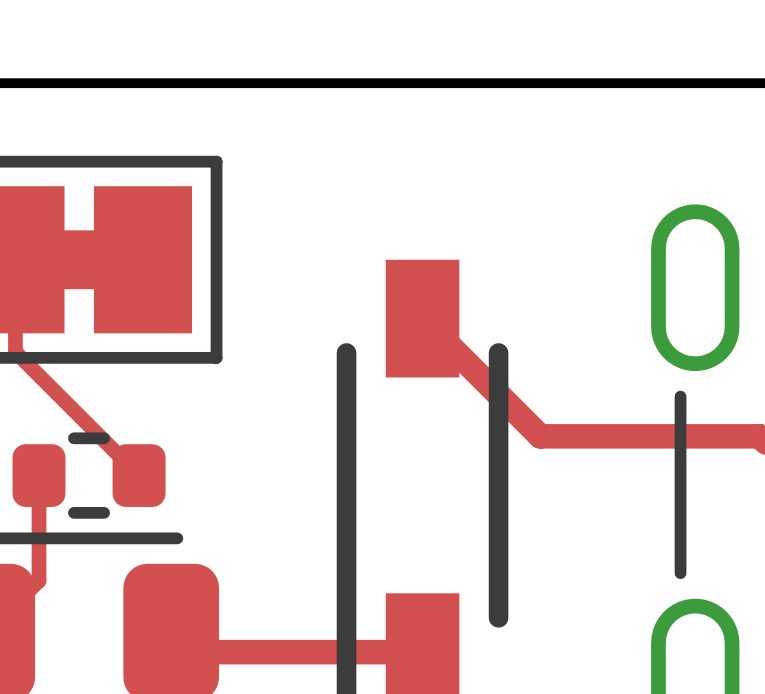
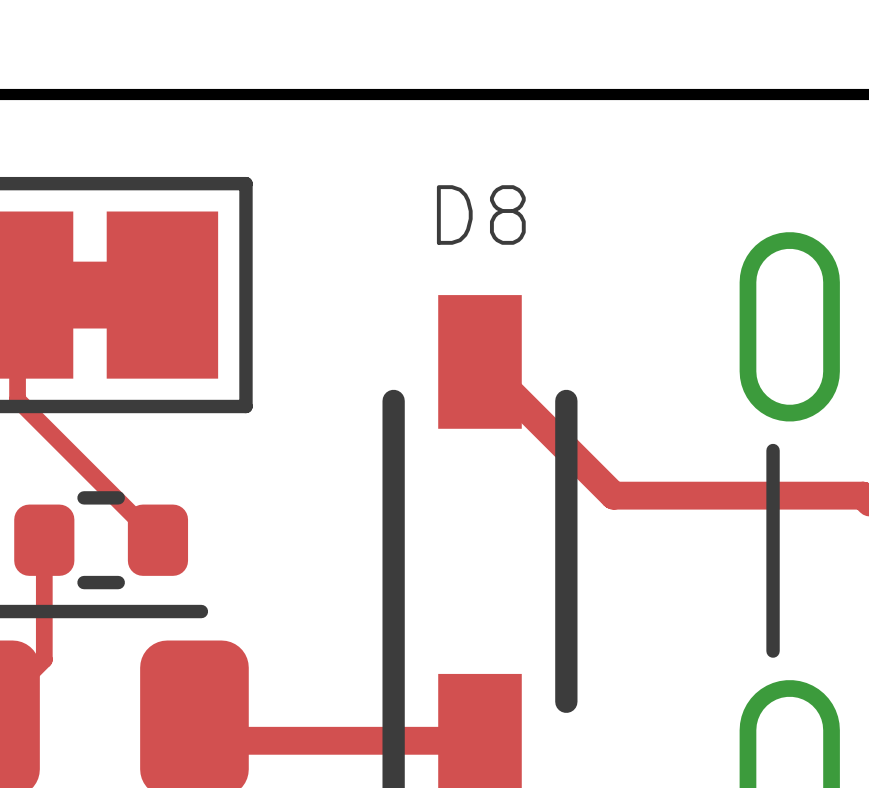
D8 name: none -> D8 (481, 214)

